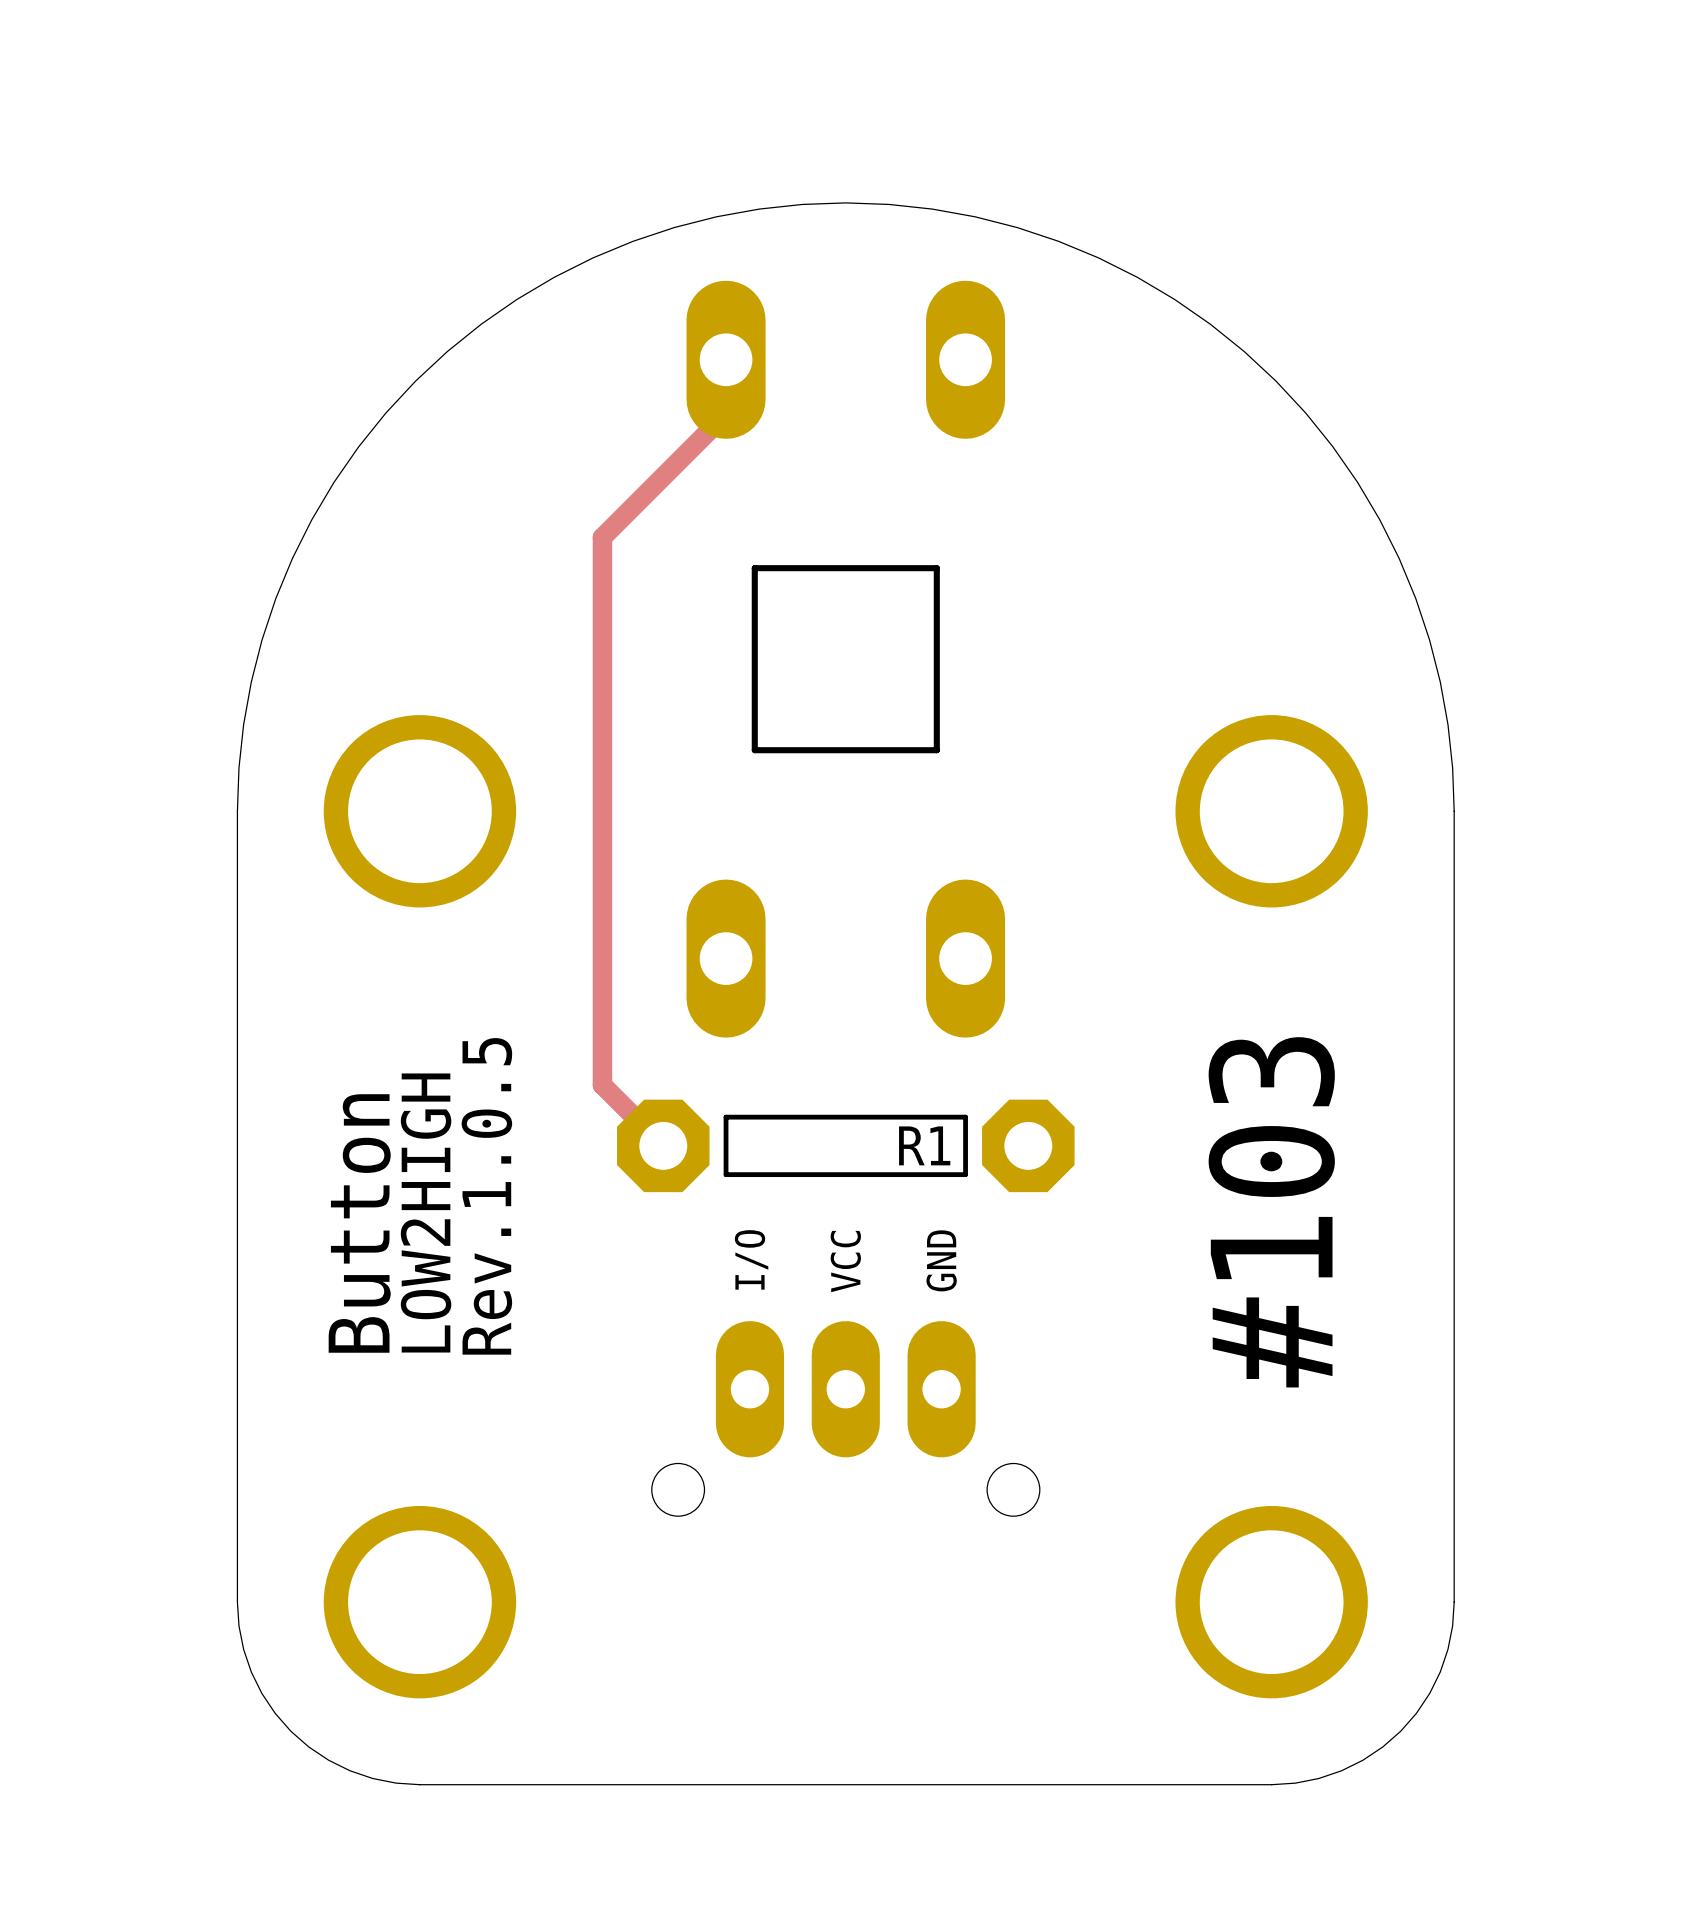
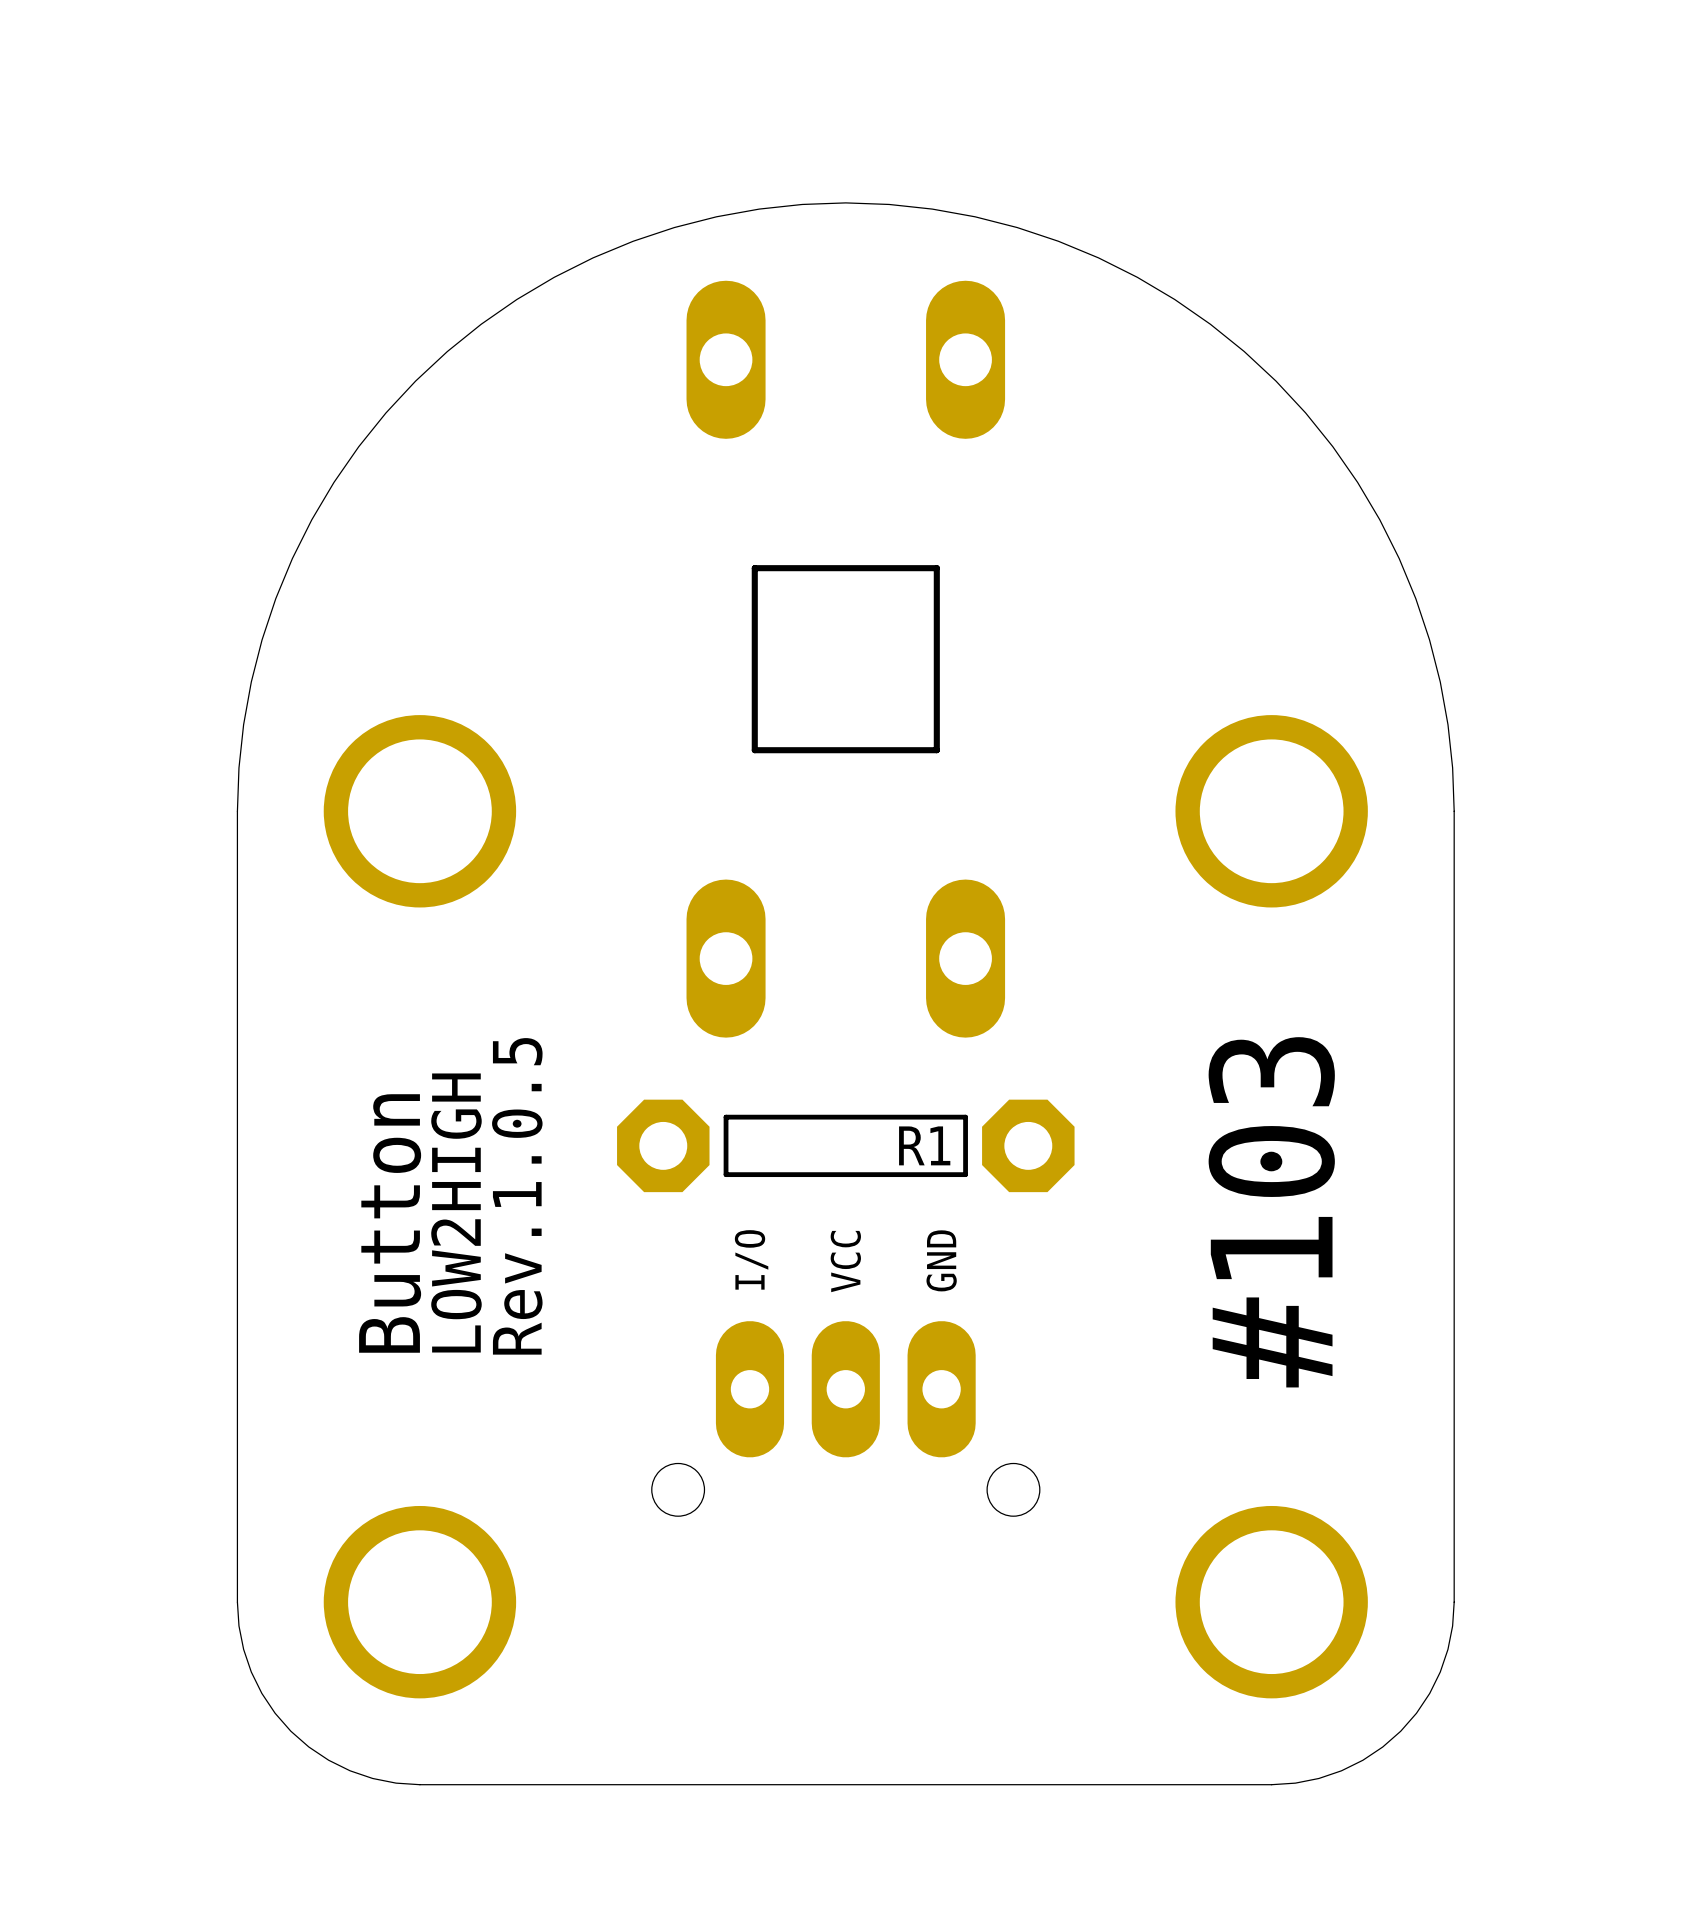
track: (726, 359) (726, 413) (602, 537) (602, 1085) (663, 1145) -> none
text position: Rev.1.0.5 (486, 1196) -> Rev.1.0.5 (517, 1196)
text position: LOW2HIGH (426, 1212) -> LOW2HIGH (456, 1212)
text position: Button (359, 1223) -> Button (390, 1223)

